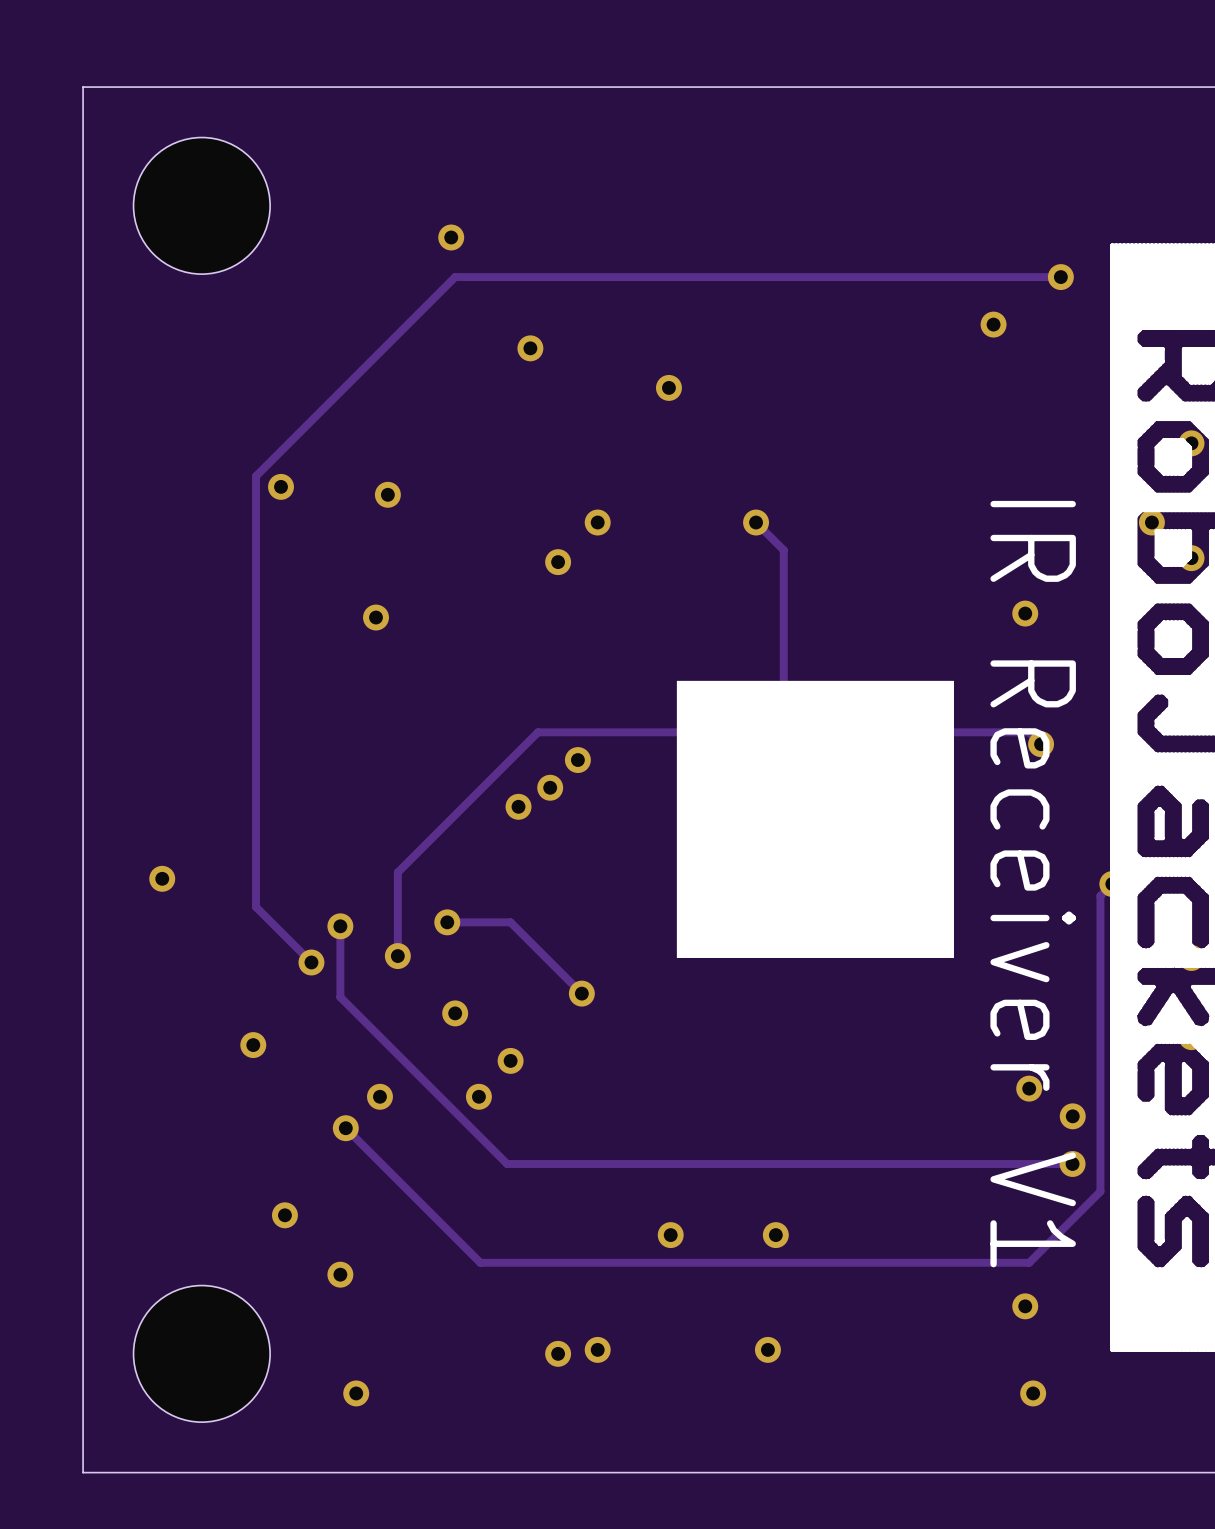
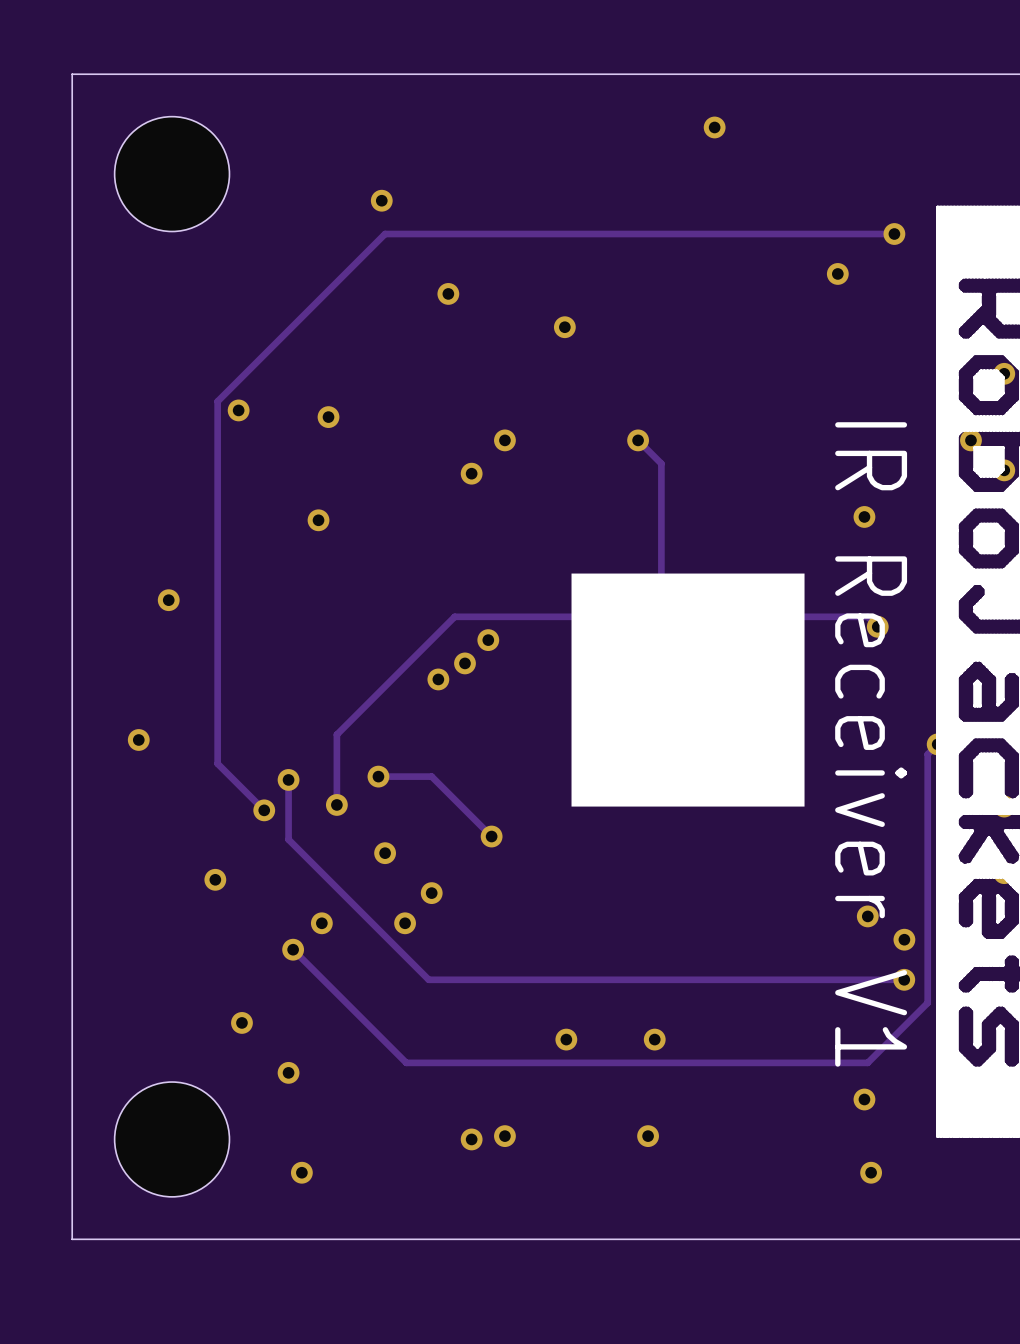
via: none -> (714, 127)
via: none -> (168, 600)

